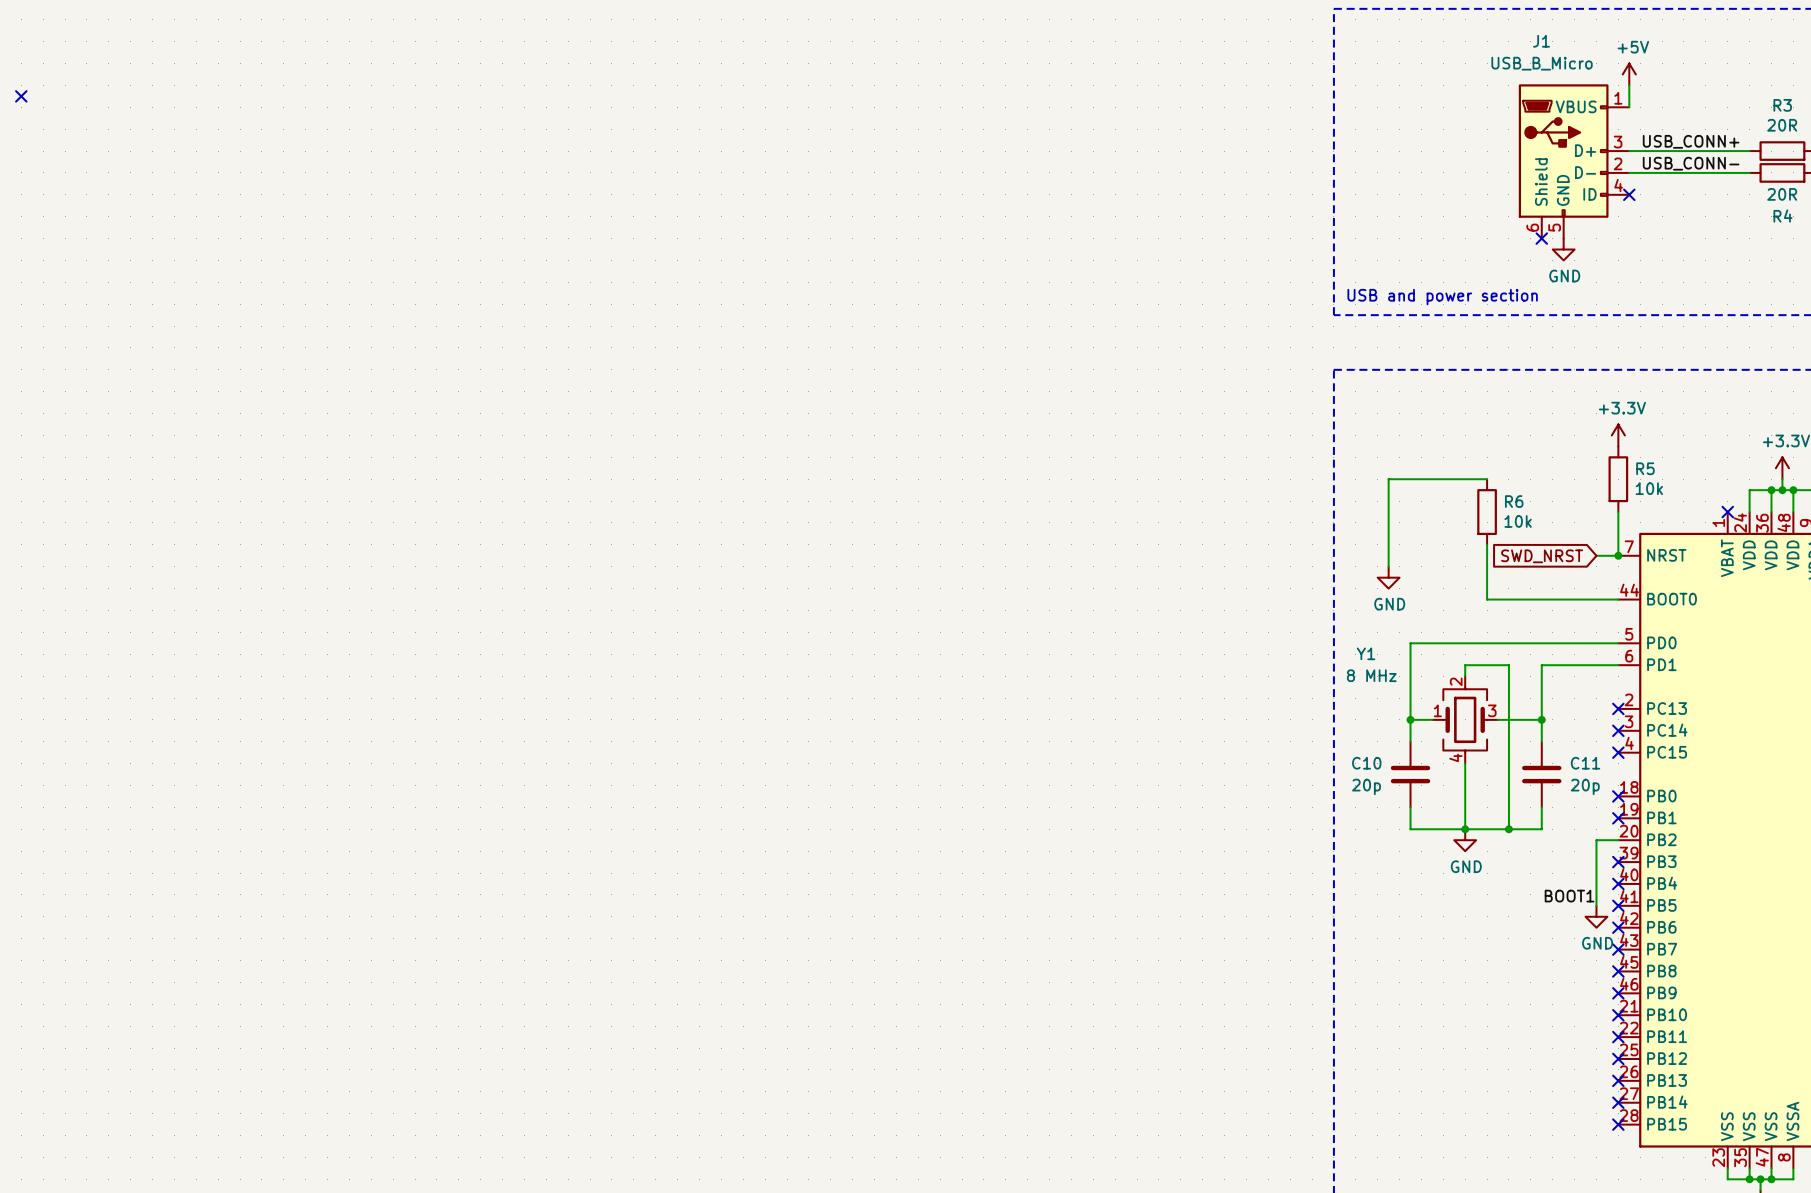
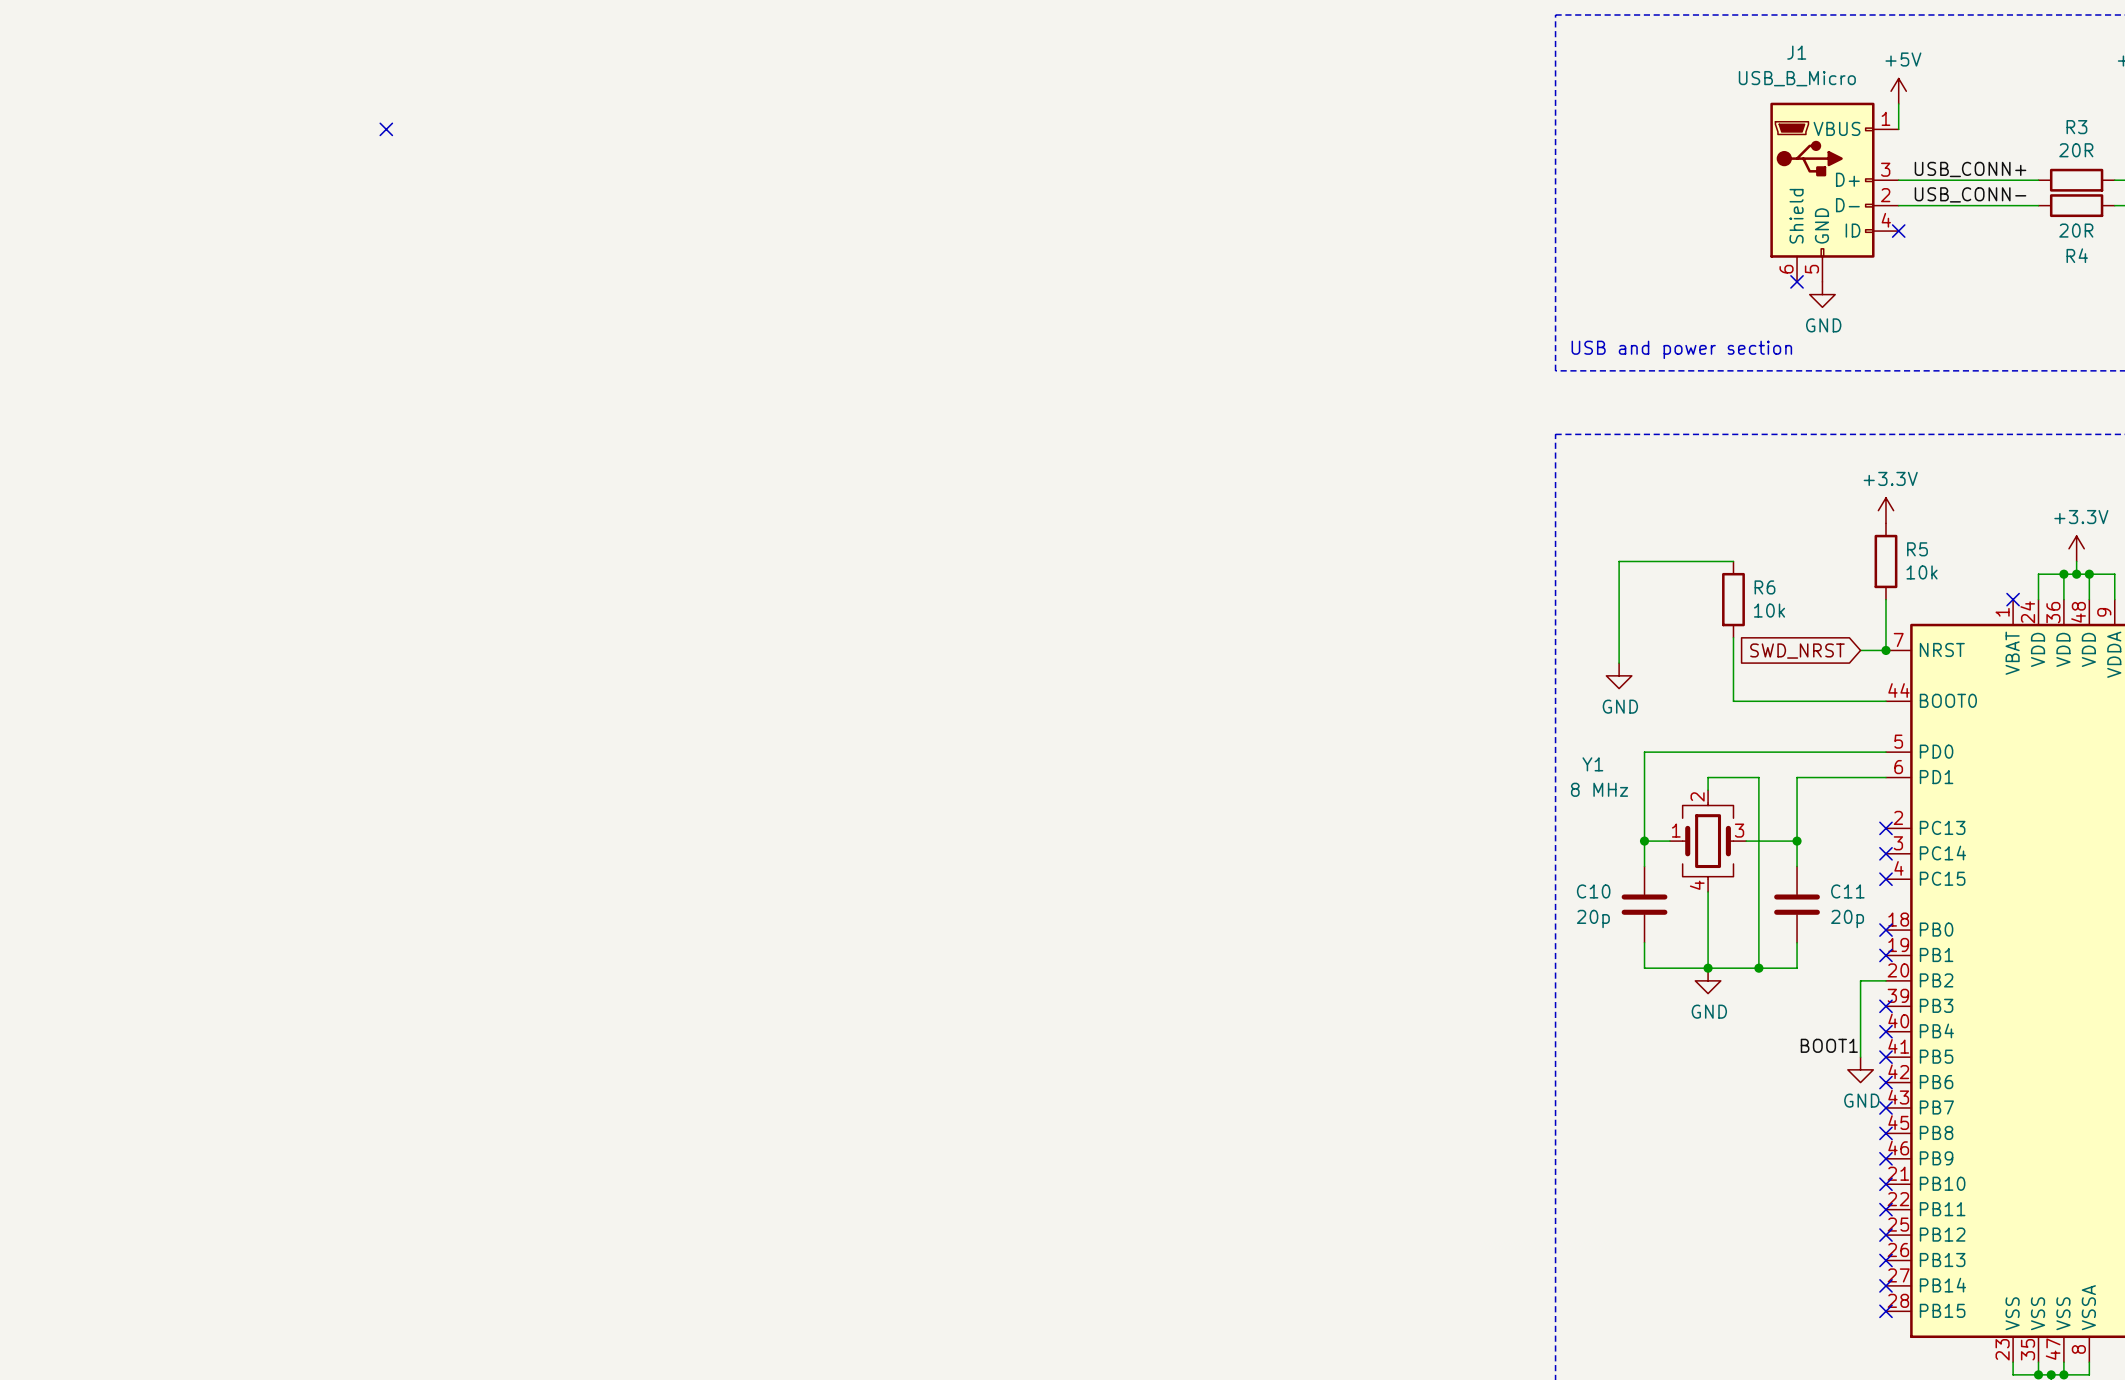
no-connect mark: (21, 96) -> none
no-connect mark: none -> (386, 129)

